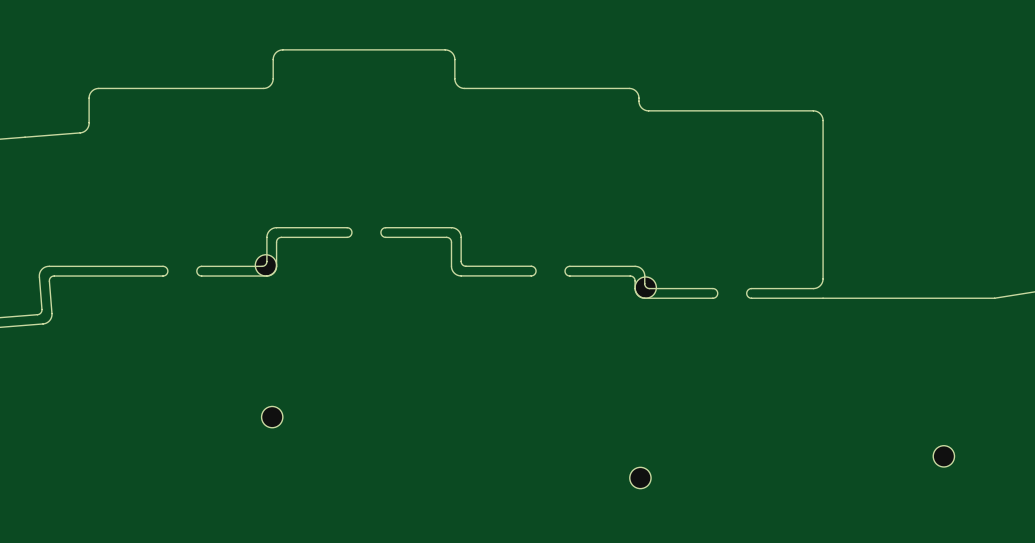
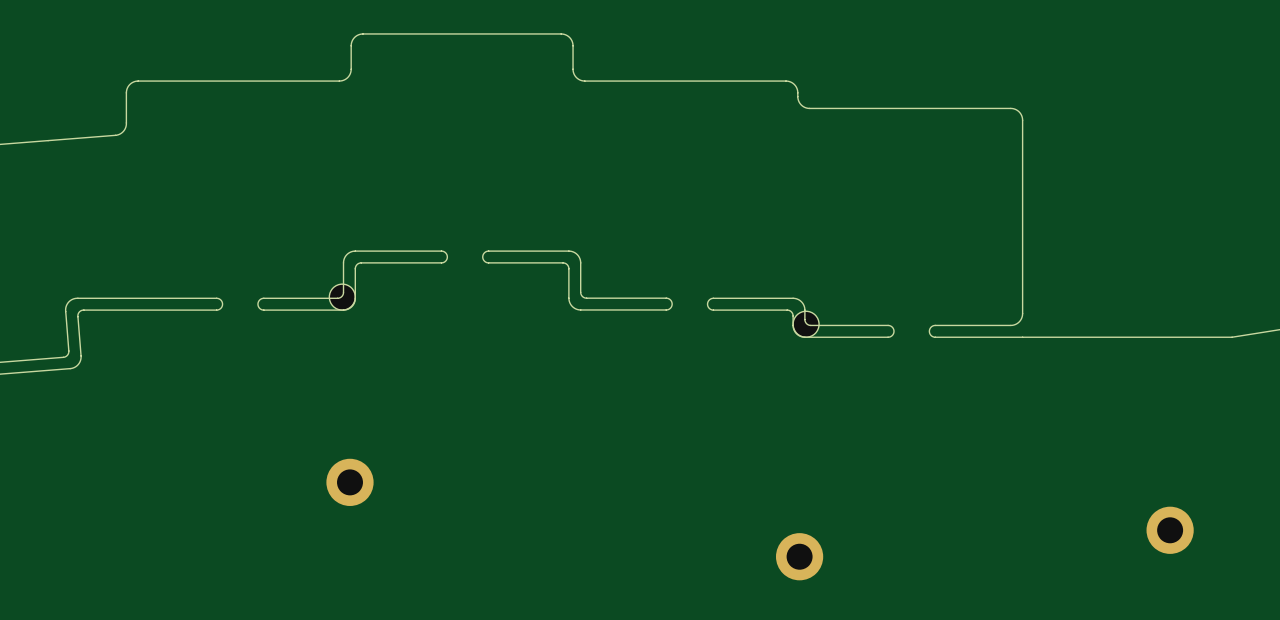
part footprint: [261, 406, 283, 428] -> [326, 458, 374, 506]
part footprint: [933, 445, 955, 467] -> [1146, 506, 1194, 554]
part footprint: [629, 467, 652, 489] -> [775, 533, 824, 581]

